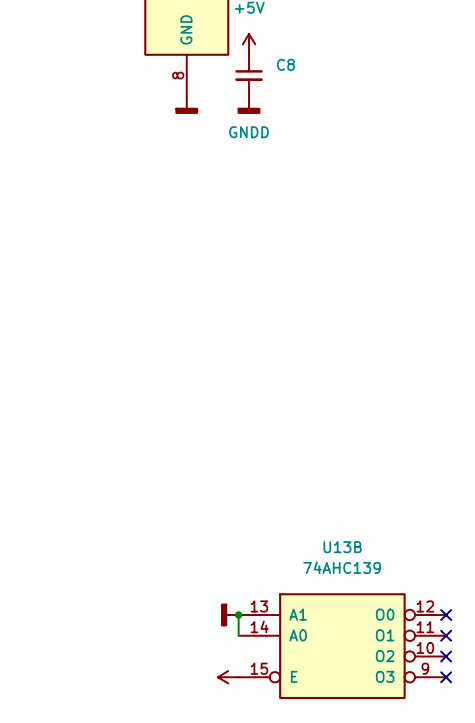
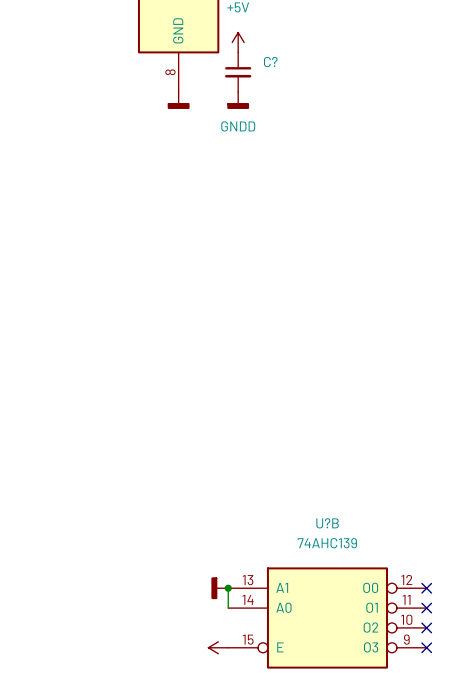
C8 name: C8 (285, 64) -> C? (270, 62)
U13B name: U13B (342, 547) -> U?B (327, 523)

